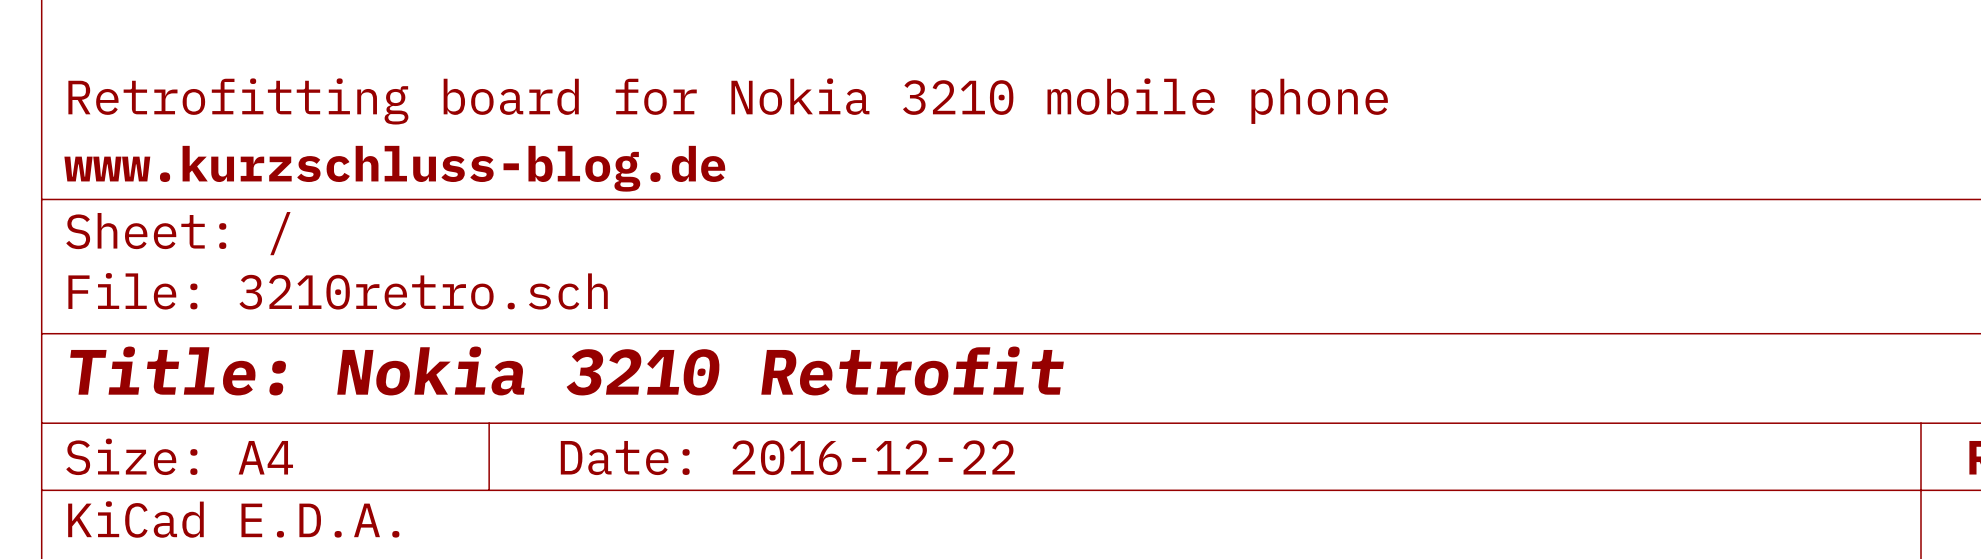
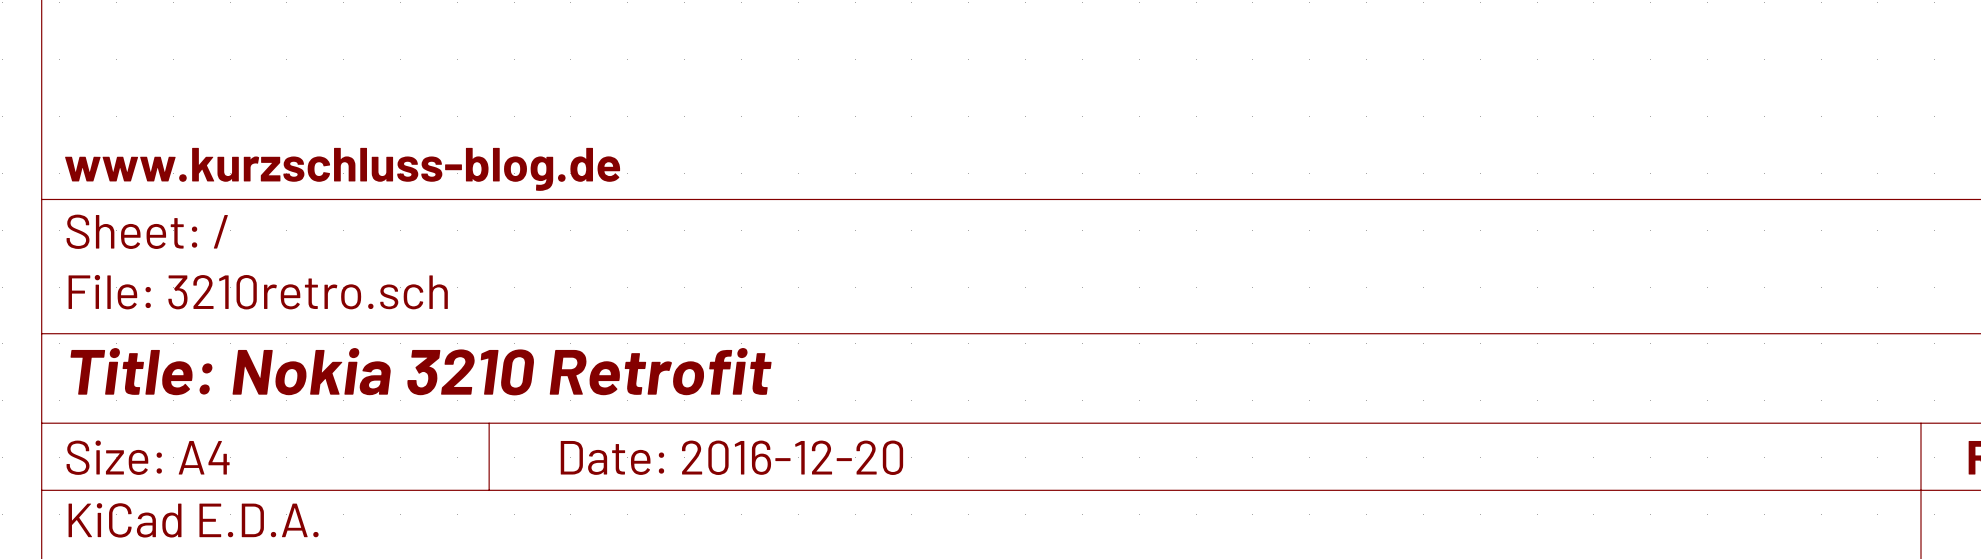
title block: Retrofitting board for Nokia 3210 mobile phone (728, 101) -> none
title block: Date: 2016-12-22 (787, 457) -> Date: 2016-12-20 (731, 457)

